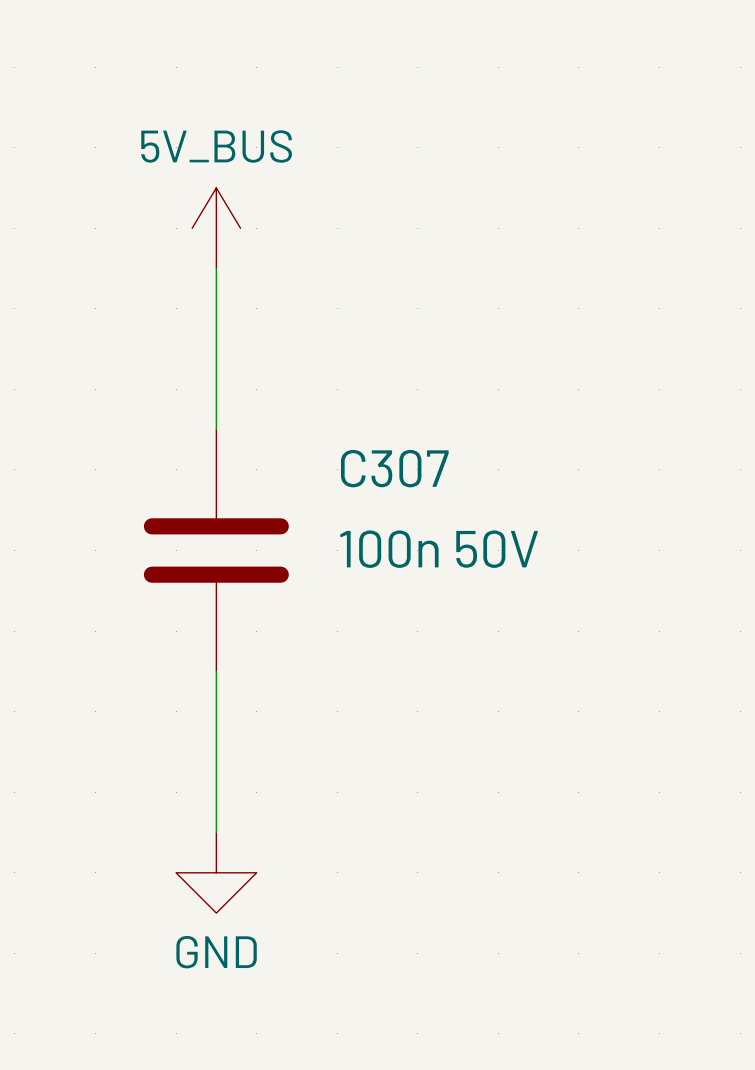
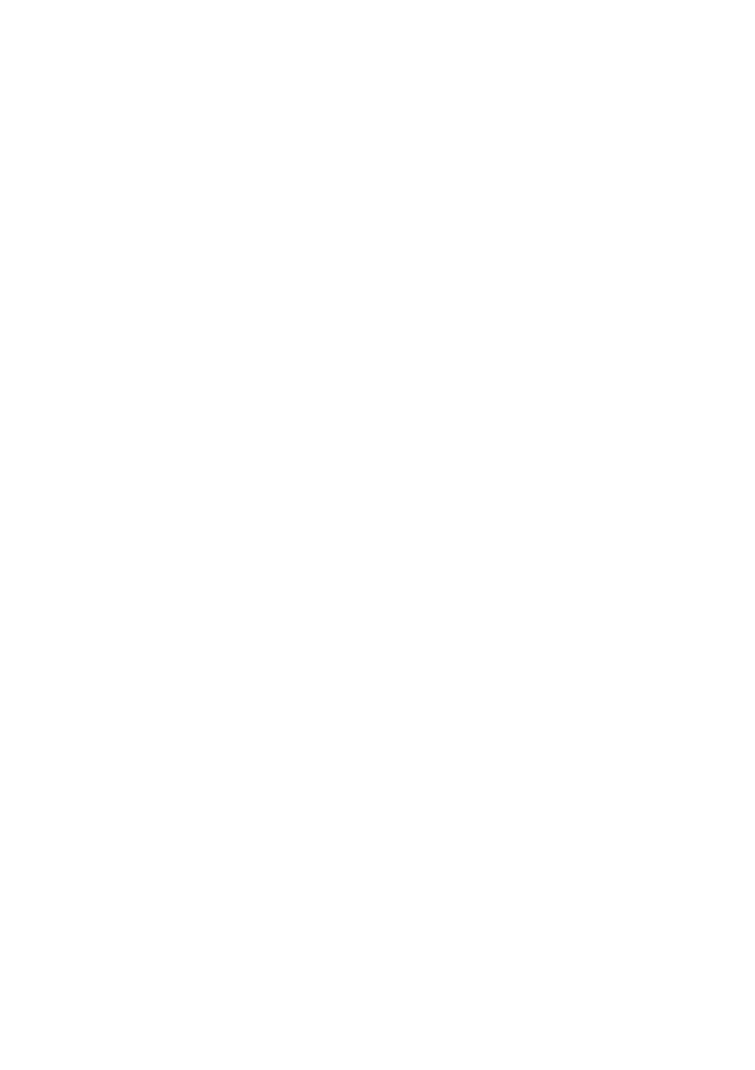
power symbol: 5V_BUS (216, 228) -> none
wire: (216, 268) (216, 429) -> none
C307: 100n 50V (216, 550) -> none
wire: (216, 671) (216, 832) -> none
power symbol: GND (216, 872) -> none

